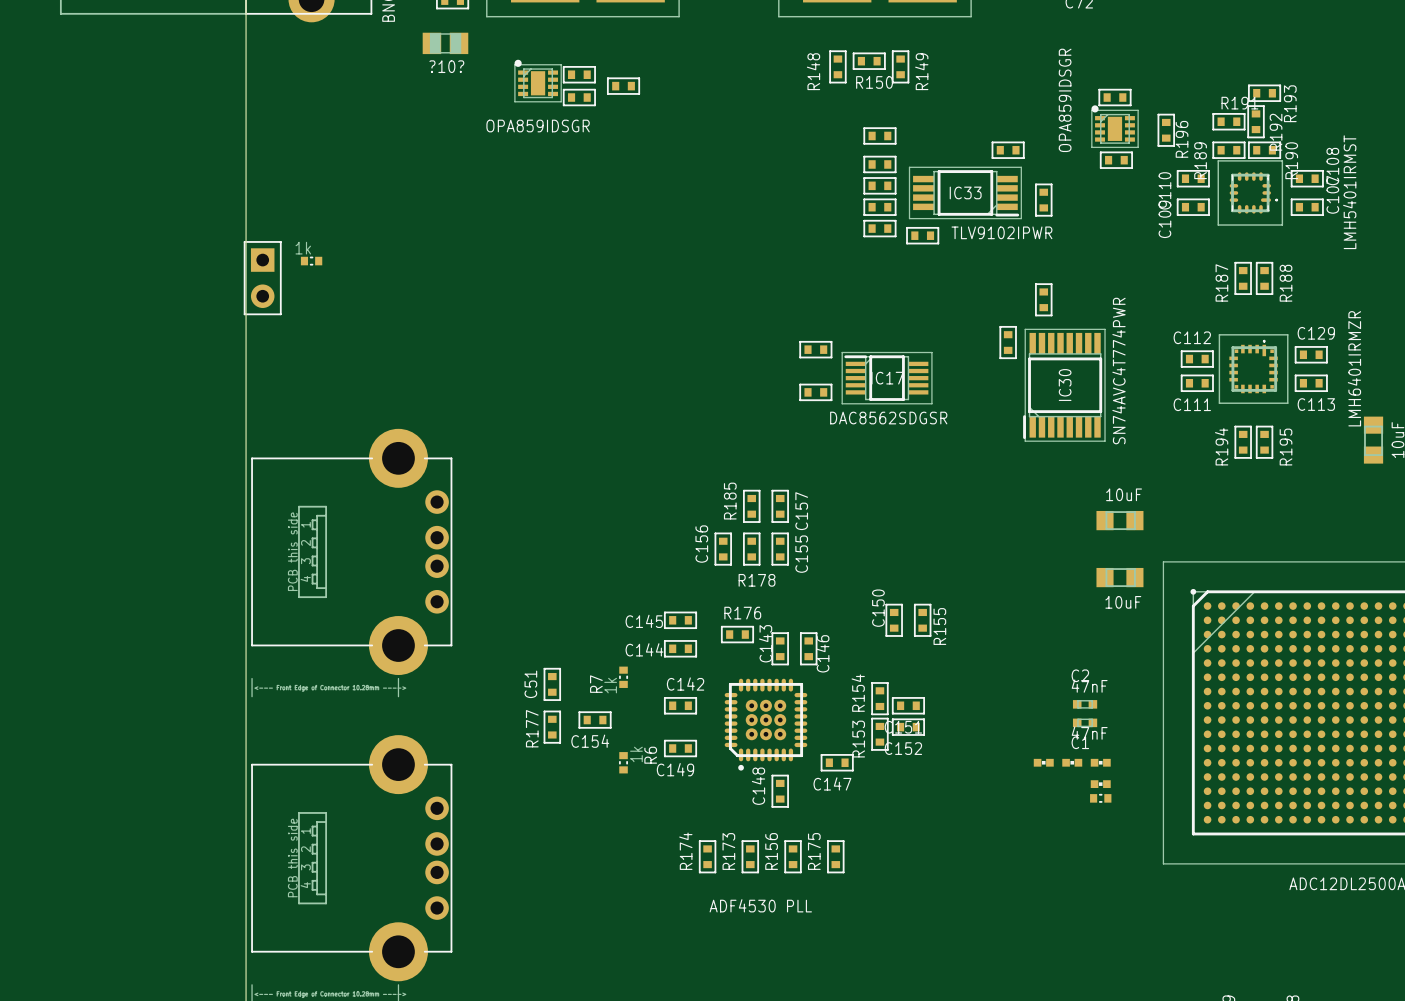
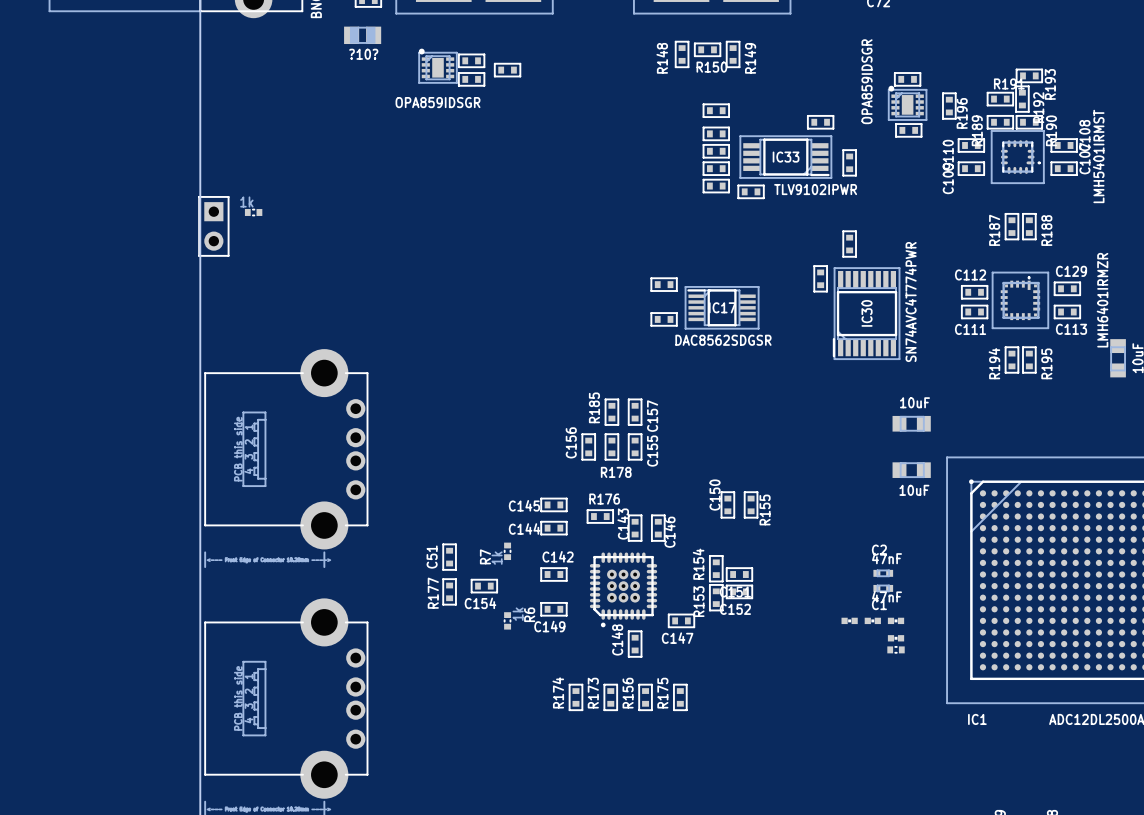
IC1 name: none -> IC1 (977, 719)
text: ADF4530 PLL (760, 905) -> none

